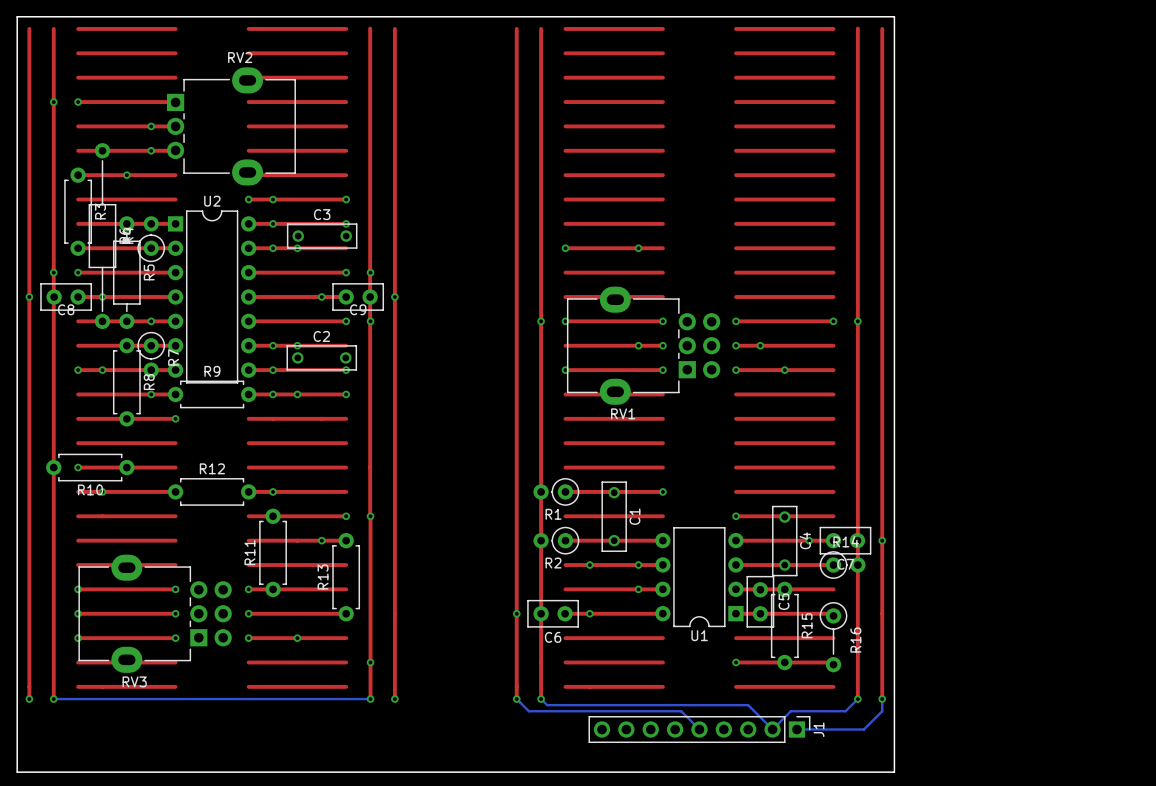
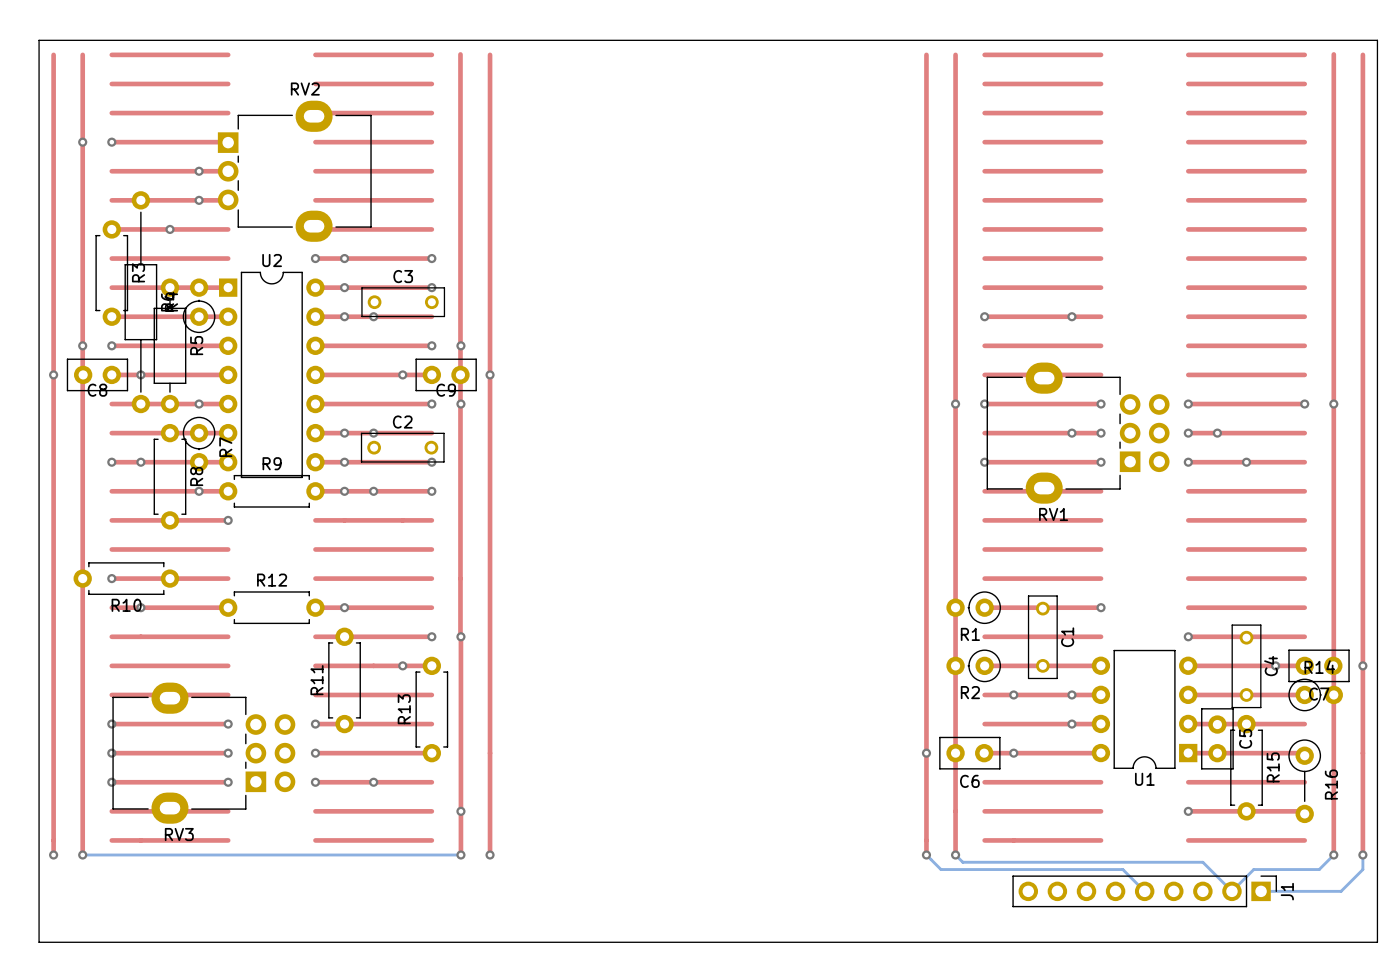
board edge: (894, 16) (894, 772) -> (1086, 40) (1377, 40) (1377, 942) (1086, 942)
top track: (516, 28) (516, 699) -> none
top track: (541, 28) (541, 699) -> (926, 54) (926, 854)
top track: (565, 28) (662, 28) -> none
top track: (736, 28) (809, 28) -> (1013, 54) (1101, 54)
top track: (857, 28) (857, 699) -> none
top track: (882, 28) (882, 699) -> (955, 54) (955, 854)
top track: none -> (1188, 54) (1304, 54)
top track: none -> (1333, 54) (1333, 854)
top track: none -> (1362, 54) (1362, 854)
top track: (565, 53) (662, 53) -> none
top track: (736, 53) (809, 53) -> (1013, 83) (1101, 83)
top track: none -> (1188, 83) (1304, 83)
top track: (565, 77) (662, 77) -> none
top track: (736, 77) (809, 77) -> (1013, 113) (1101, 113)
top track: none -> (1188, 113) (1304, 113)
top track: (565, 102) (662, 102) -> none
top track: (736, 102) (809, 102) -> (1013, 142) (1101, 142)
top track: none -> (1188, 142) (1304, 142)
top track: (565, 126) (662, 126) -> none
top track: (736, 126) (809, 126) -> (1013, 171) (1101, 171)
top track: none -> (1188, 171) (1304, 171)
top track: (565, 150) (662, 150) -> none
top track: (736, 150) (809, 150) -> (1013, 200) (1101, 200)
top track: none -> (1188, 200) (1304, 200)
top track: (565, 175) (662, 175) -> none
top track: (736, 175) (809, 175) -> (1013, 229) (1101, 229)
top track: none -> (1188, 229) (1304, 229)
top track: (565, 199) (662, 199) -> none
top track: (736, 199) (809, 199) -> (1013, 258) (1101, 258)
top track: none -> (1188, 258) (1304, 258)
top track: (565, 223) (662, 223) -> none
top track: (736, 223) (809, 223) -> (1013, 287) (1101, 287)
top track: none -> (1188, 287) (1304, 287)
top track: (565, 248) (662, 248) -> none
via: (565, 248) -> none
via: (638, 248) -> none
top track: (736, 248) (809, 248) -> (1013, 316) (1101, 316)
via: none -> (984, 316)
via: none -> (1071, 316)
top track: none -> (1188, 316) (1304, 316)
top track: (565, 272) (662, 272) -> none
top track: (736, 272) (809, 272) -> (1013, 345) (1101, 345)
top track: none -> (1188, 345) (1304, 345)
top track: (565, 296) (662, 296) -> none
top track: (736, 296) (809, 296) -> (1013, 374) (1101, 374)
top track: none -> (1188, 374) (1304, 374)
via: (541, 321) -> none
top track: (565, 321) (662, 321) -> none
via: (565, 321) -> none
via: (662, 321) -> none
top track: (736, 321) (809, 321) -> (1013, 404) (1101, 404)
via: (736, 321) -> none
via: none -> (955, 404)
via: none -> (984, 404)
via: (833, 321) -> none
via: (857, 321) -> none
via: none -> (1101, 404)
top track: none -> (1188, 404) (1304, 404)
via: none -> (1188, 404)
via: none -> (1304, 404)
via: none -> (1333, 404)
top track: (565, 345) (662, 345) -> none
via: (638, 345) -> none
RV1 position: (643, 345) -> (1078, 433)
via: (662, 345) -> none
top track: (736, 345) (809, 345) -> (1013, 433) (1101, 433)
via: (736, 345) -> none
via: (760, 345) -> none
via: none -> (1071, 433)
via: none -> (1101, 433)
top track: none -> (1188, 433) (1304, 433)
via: none -> (1188, 433)
via: none -> (1217, 433)
top track: (565, 370) (662, 370) -> none
via: (565, 370) -> none
via: (662, 370) -> none
top track: (736, 370) (809, 370) -> (1013, 462) (1101, 462)
via: (736, 370) -> none
via: (784, 370) -> none
via: none -> (984, 462)
via: none -> (1101, 462)
top track: none -> (1188, 462) (1304, 462)
via: none -> (1188, 462)
via: none -> (1246, 462)
top track: (565, 394) (662, 394) -> none
top track: (736, 394) (809, 394) -> (1013, 491) (1101, 491)
top track: none -> (1188, 491) (1304, 491)
top track: (565, 418) (662, 418) -> none
top track: (736, 418) (809, 418) -> (1013, 520) (1101, 520)
top track: none -> (1188, 520) (1304, 520)
top track: (565, 443) (662, 443) -> none
top track: (736, 443) (809, 443) -> (1013, 549) (1101, 549)
top track: none -> (1188, 549) (1304, 549)
top track: (565, 467) (662, 467) -> none
top track: (736, 467) (809, 467) -> (1013, 578) (1101, 578)
top track: none -> (1188, 578) (1304, 578)
R1 position: (556, 491) -> (973, 607)
top track: (565, 491) (662, 491) -> none
via: (662, 491) -> none
top track: (736, 491) (809, 491) -> (1013, 607) (1101, 607)
via: none -> (1101, 607)
top track: none -> (1188, 607) (1304, 607)
top track: (565, 516) (662, 516) -> none
C1 position: (614, 516) -> (1042, 637)
top track: (736, 516) (809, 516) -> (1013, 636) (1101, 636)
via: (736, 516) -> none
top track: none -> (1188, 636) (1304, 636)
via: none -> (1188, 636)
R2 position: (556, 540) -> (973, 665)
top track: (565, 540) (662, 540) -> none
top track: (736, 540) (809, 540) -> (1013, 665) (1101, 665)
via: (809, 540) -> none
C7 position: (845, 540) -> (1319, 665)
via: (882, 540) -> none
top track: none -> (1188, 665) (1304, 665)
via: none -> (1275, 665)
via: none -> (1362, 665)
C4 position: (784, 541) -> (1246, 666)
top track: (565, 565) (662, 565) -> none
via: (589, 565) -> none
via: (638, 565) -> none
top track: (736, 565) (809, 565) -> (1013, 694) (1101, 694)
via: none -> (1013, 694)
R14 position: (842, 565) -> (1315, 694)
via: none -> (1071, 694)
top track: none -> (1188, 694) (1304, 694)
U1 position: (699, 577) -> (1144, 709)
top track: (565, 589) (662, 589) -> none
via: (638, 589) -> none
top track: (736, 589) (809, 589) -> (1013, 724) (1101, 724)
via: none -> (1071, 724)
top track: none -> (1188, 724) (1304, 724)
C5 position: (760, 601) -> (1217, 738)
via: (516, 613) -> none
C6 position: (553, 613) -> (969, 753)
top track: (565, 613) (662, 613) -> none
via: (589, 613) -> none
top track: (736, 613) (809, 613) -> (1013, 753) (1101, 753)
via: none -> (926, 753)
via: none -> (1013, 753)
top track: none -> (1188, 753) (1304, 753)
R15 position: (784, 625) -> (1246, 767)
R16 position: (833, 637) -> (1304, 781)
top track: (565, 638) (662, 638) -> none
top track: (736, 638) (809, 638) -> (1013, 782) (1101, 782)
top track: none -> (1188, 782) (1304, 782)
top track: (565, 662) (662, 662) -> none
top track: (736, 662) (809, 662) -> (1013, 811) (1101, 811)
via: (736, 662) -> none
top track: none -> (1188, 811) (1304, 811)
via: none -> (1188, 811)
top track: (565, 686) (662, 686) -> none
top track: (736, 686) (809, 686) -> (1013, 840) (1101, 840)
top track: none -> (1188, 840) (1304, 840)
bottom track: (516, 699) (528, 711) (681, 711) (699, 729) -> none
via: (516, 699) -> none
bottom track: (541, 699) (547, 705) (748, 705) (772, 729) (790, 711) -> (926, 854) (941, 869) (962, 869)
via: (541, 699) -> none
via: none -> (926, 854)
bottom track: none -> (955, 854) (962, 862) (1202, 862) (1231, 891) (1253, 869) (1319, 869) (1333, 854)
via: none -> (955, 854)
bottom track: (857, 699) (845, 711) -> (1144, 891) (1122, 869) (1028, 869)
via: (857, 699) -> none
bottom track: (882, 699) (882, 711) (863, 729) (796, 729) -> none
via: (882, 699) -> none
via: none -> (1333, 854)
bottom track: none -> (1362, 854) (1362, 869) (1341, 891) (1261, 891)
via: none -> (1362, 854)
J1 position: (699, 729) -> (1144, 891)

